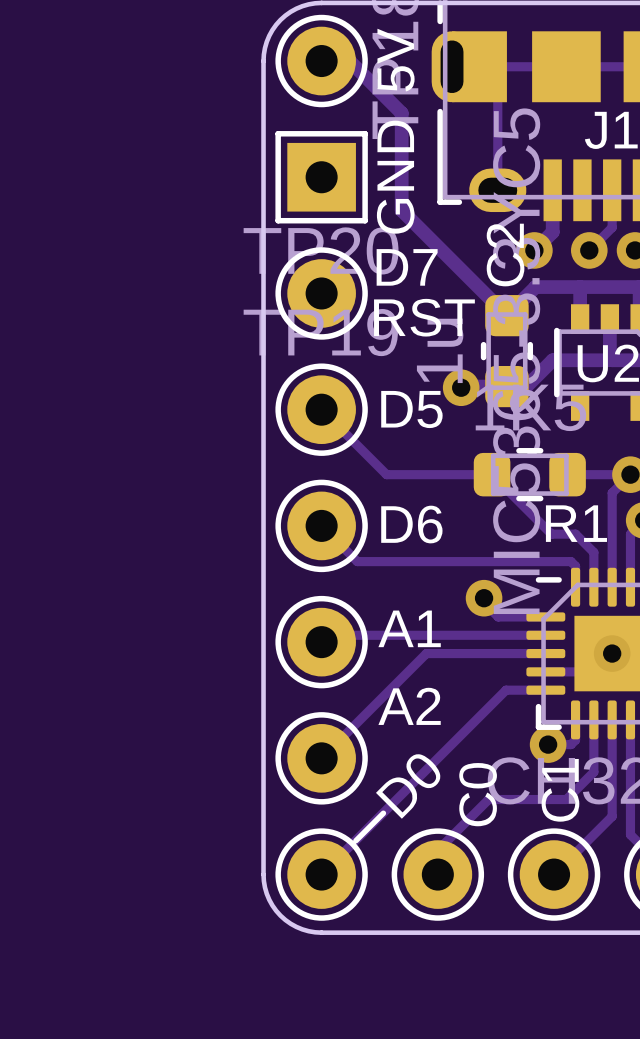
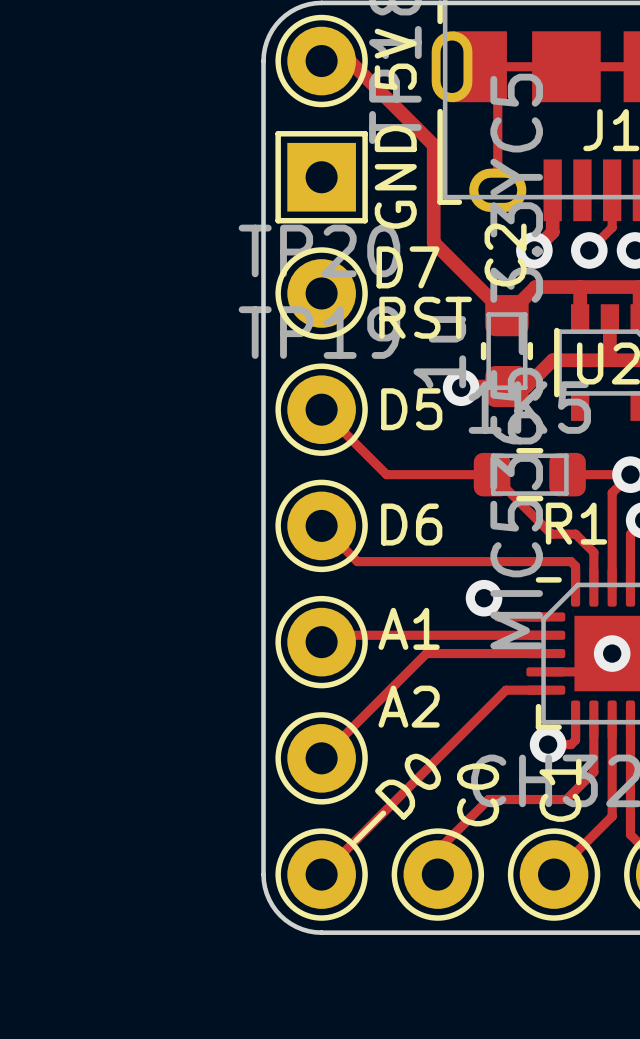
track: (401, 113) (401, 210) (433, 242) -> (401, 113) (433, 145) (433, 242)

